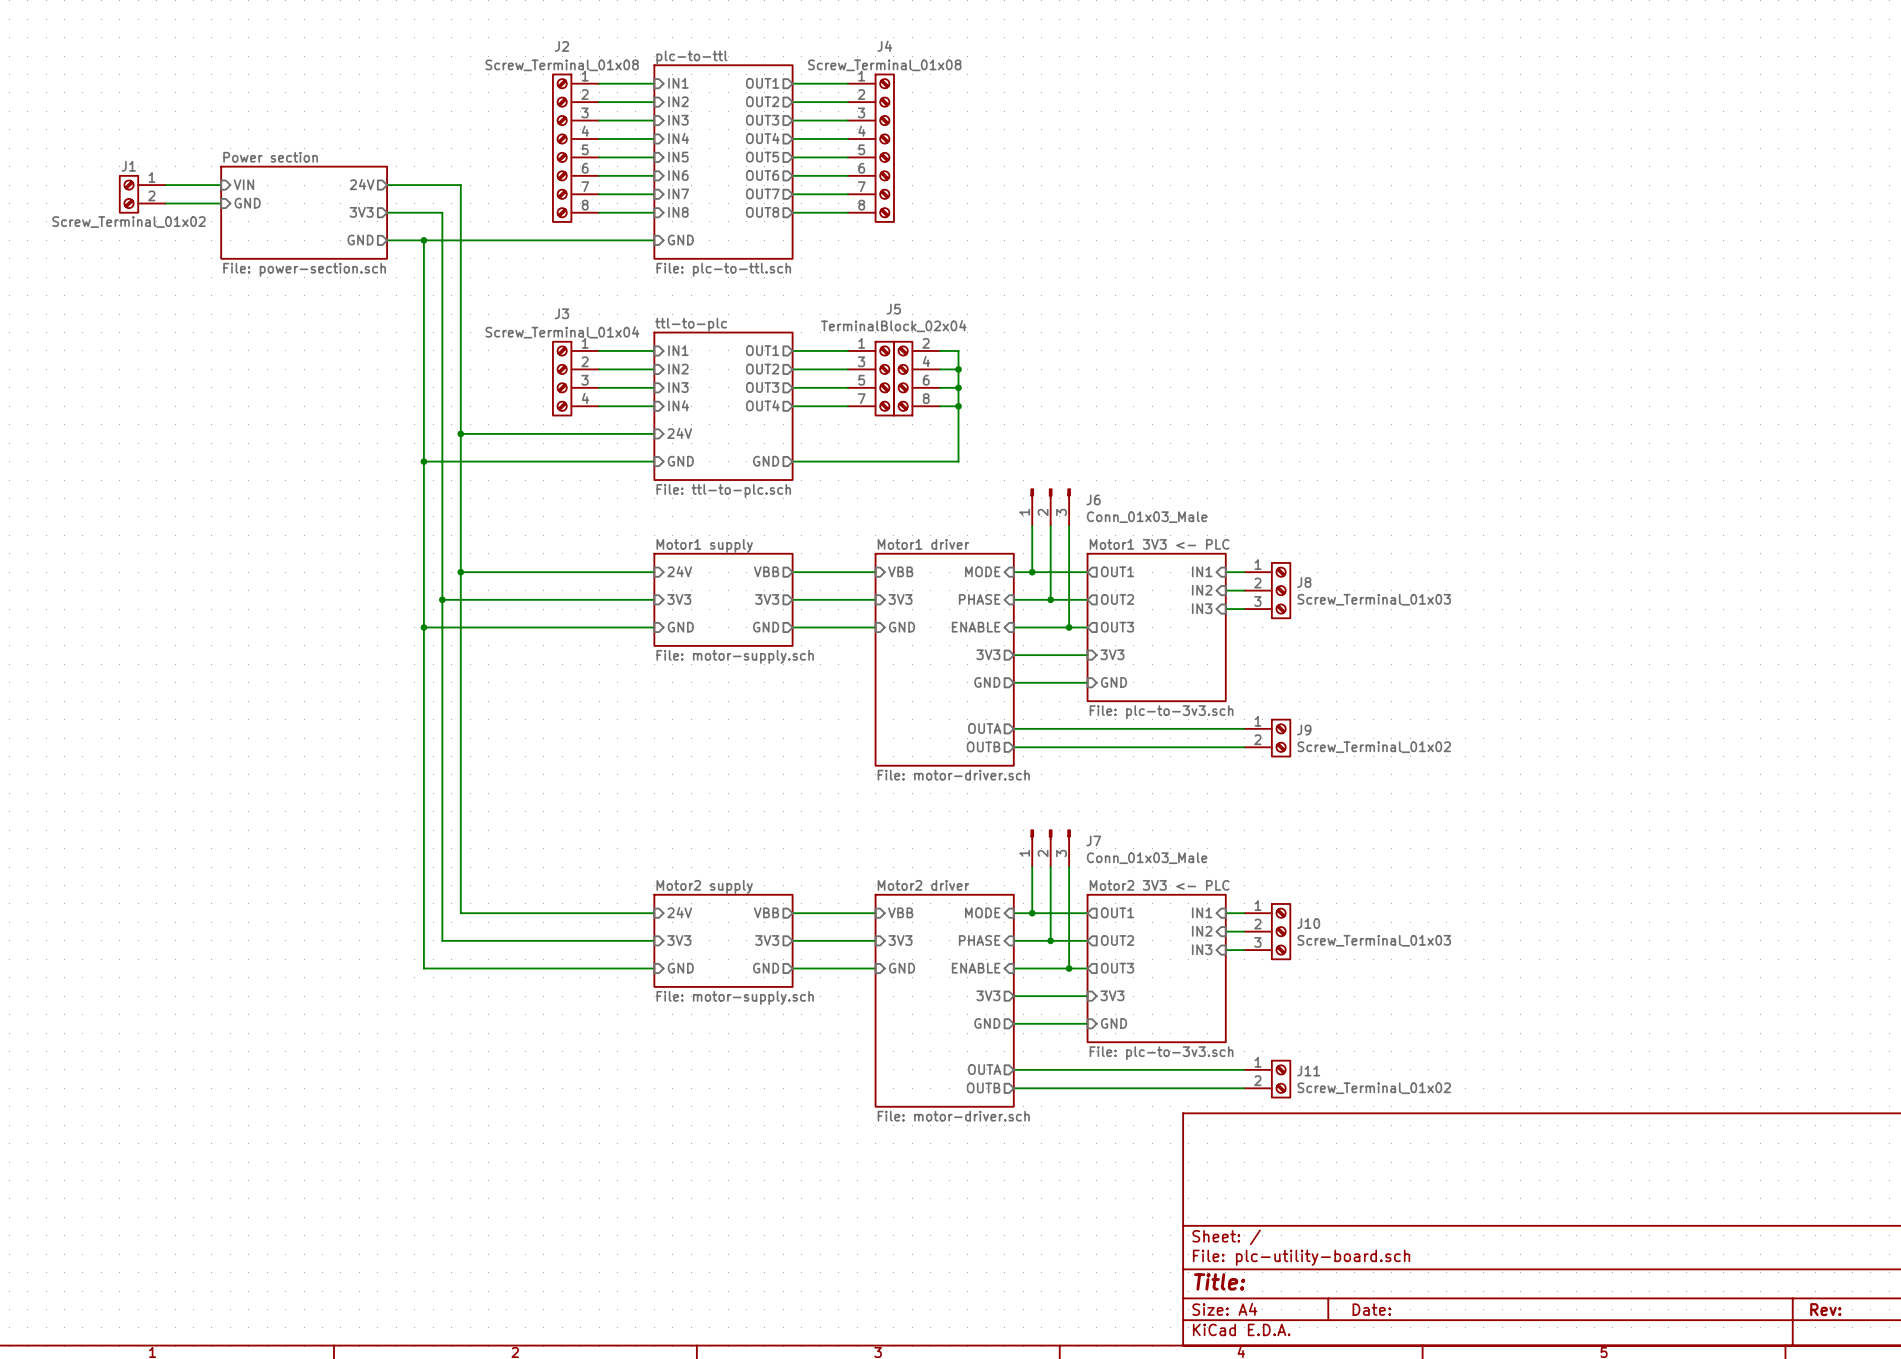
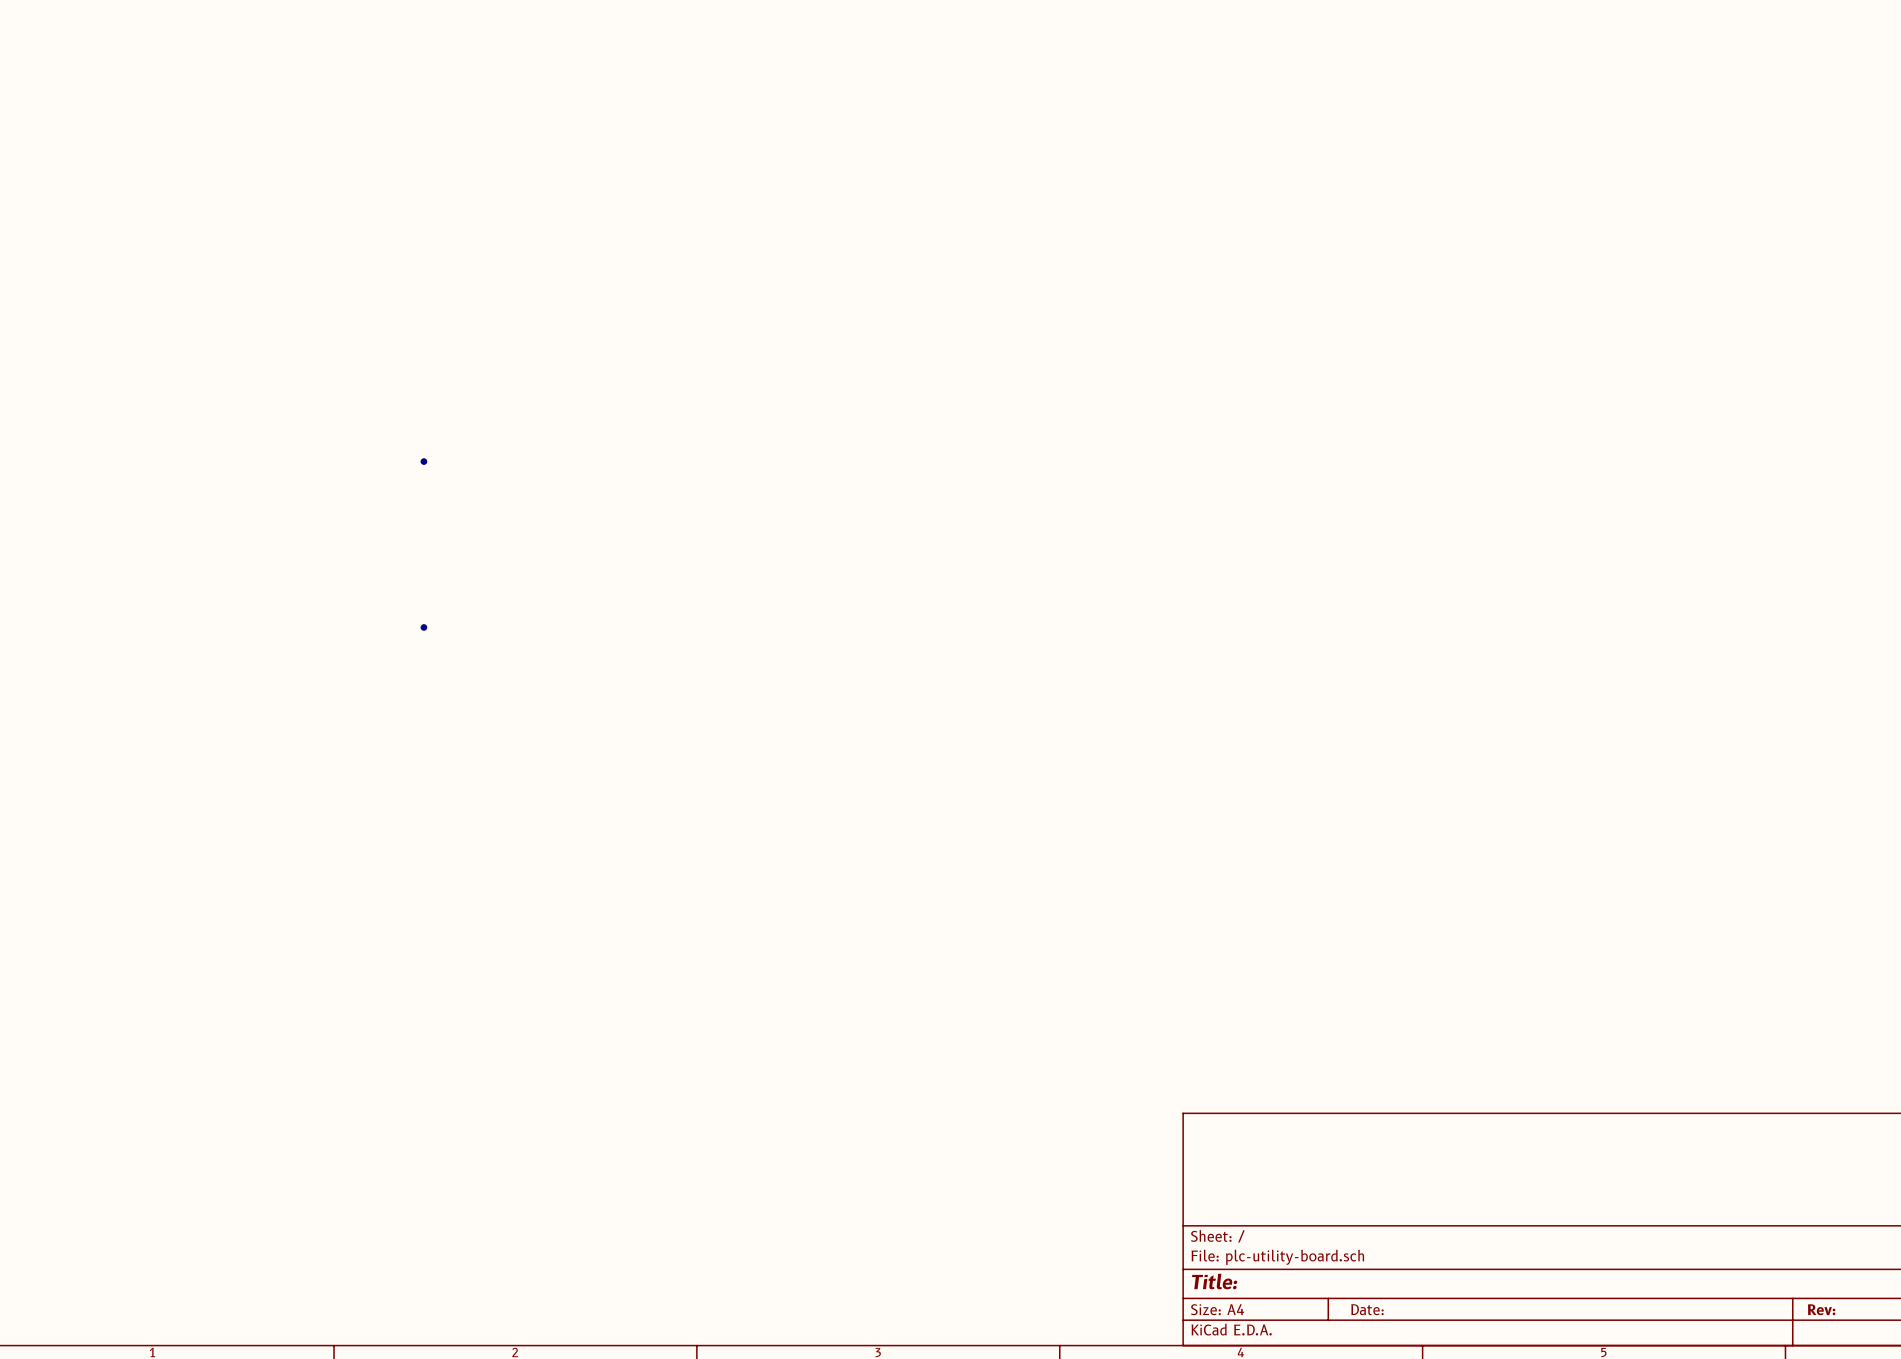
wire: (599, 83) (654, 83) -> none
sheet pin: IN1 (678, 83) -> none
sheet pin: OUT1 (762, 83) -> none
wire: (792, 83) (847, 83) -> none
sheet pin: IN2 (678, 101) -> none
sheet pin: OUT2 (762, 101) -> none
wire: (599, 102) (654, 102) -> none
wire: (792, 102) (847, 102) -> none
wire: (599, 120) (654, 120) -> none
sheet pin: IN3 (678, 120) -> none
sheet pin: OUT3 (762, 120) -> none
wire: (792, 120) (847, 120) -> none
wire: (599, 138) (654, 138) -> none
sheet pin: IN4 (678, 138) -> none
sheet pin: OUT4 (762, 138) -> none
wire: (792, 138) (847, 138) -> none
J2: Screw_Terminal_01x08 (575, 148) -> none
J4: Screw_Terminal_01x08 (871, 148) -> none
wire: (599, 157) (654, 157) -> none
sheet pin: IN5 (678, 157) -> none
sheet pin: OUT5 (762, 157) -> none
wire: (792, 157) (847, 157) -> none
sheet plc-to-ttl: File: plc-to-ttl.sch (723, 162) -> none
wire: (599, 175) (654, 175) -> none
sheet pin: IN6 (678, 175) -> none
sheet pin: OUT6 (762, 175) -> none
wire: (792, 175) (847, 175) -> none
sheet pin: VIN (243, 184) -> none
sheet pin: 24V (362, 184) -> none
wire: (165, 185) (221, 185) -> none
wire: (387, 185) (460, 185) (460, 913) (654, 913) -> none
sheet pin: IN7 (678, 193) -> none
sheet pin: OUT7 (762, 193) -> none
J1: Screw_Terminal_01x02 (142, 194) -> none
wire: (599, 194) (654, 194) -> none
wire: (792, 194) (847, 194) -> none
wire: (165, 203) (221, 203) -> none
sheet pin: GND (247, 203) -> none
sheet Power section: File: power-section.sch (304, 212) -> none
sheet pin: 3V3 (361, 212) -> none
wire: (387, 212) (442, 212) (442, 940) (654, 940) -> none
wire: (599, 212) (654, 212) -> none
sheet pin: IN8 (678, 212) -> none
sheet pin: OUT8 (762, 212) -> none
wire: (792, 212) (847, 212) -> none
sheet pin: GND (360, 240) -> none
wire: (387, 240) (654, 240) -> none
wire: (423, 240) (423, 968) (654, 968) -> none
junction: (423, 240) -> none
sheet pin: GND (680, 240) -> none
wire: (599, 350) (654, 350) -> none
sheet pin: IN1 (678, 350) -> none
sheet pin: OUT1 (762, 350) -> none
wire: (792, 350) (847, 350) -> none
wire: (940, 350) (958, 350) (958, 461) (792, 461) -> none
wire: (599, 369) (654, 369) -> none
sheet pin: IN2 (678, 369) -> none
sheet pin: OUT2 (762, 369) -> none
wire: (792, 369) (847, 369) -> none
wire: (940, 369) (958, 369) -> none
junction: (958, 369) -> none
J3: Screw_Terminal_01x04 (575, 378) -> none
J5: TerminalBlock_02x04 (893, 378) -> none
wire: (599, 387) (654, 387) -> none
sheet pin: IN3 (678, 387) -> none
sheet pin: OUT3 (762, 387) -> none
wire: (792, 387) (847, 387) -> none
wire: (940, 387) (958, 387) -> none
junction: (958, 387) -> none
sheet pin: IN4 (678, 405) -> none
sheet pin: OUT4 (762, 405) -> none
wire: (599, 406) (654, 406) -> none
sheet ttl-to-plc: File: ttl-to-plc.sch (723, 406) -> none
wire: (792, 406) (847, 406) -> none
wire: (940, 406) (958, 406) -> none
junction: (958, 406) -> none
wire: (460, 433) (654, 433) -> none
junction: (460, 433) -> none
sheet pin: 24V (679, 433) -> none
wire: (423, 461) (654, 461) -> none
sheet pin: GND (680, 461) -> none
sheet pin: GND (766, 461) -> none
J6: Conn_01x03_Male (1050, 507) -> none
wire: (1032, 526) (1032, 572) -> none
wire: (1050, 526) (1050, 599) -> none
wire: (1069, 526) (1069, 627) -> none
sheet pin: 24V (679, 571) -> none
sheet pin: VBB (766, 571) -> none
sheet pin: VBB (900, 571) -> none
sheet pin: MODE (982, 571) -> none
sheet pin: OUT1 (1117, 571) -> none
sheet pin: IN1 (1202, 571) -> none
wire: (460, 572) (654, 572) -> none
junction: (460, 572) -> none
wire: (792, 572) (875, 572) -> none
wire: (1013, 572) (1087, 572) -> none
junction: (1032, 572) -> none
wire: (1225, 572) (1244, 572) -> none
sheet pin: IN2 (1202, 590) -> none
wire: (1225, 590) (1244, 590) -> none
J8: Screw_Terminal_01x03 (1267, 590) -> none
wire: (442, 599) (654, 599) -> none
junction: (442, 599) -> none
sheet pin: 3V3 (679, 599) -> none
sheet Motor1 supply: File: motor-supply.sch (723, 599) -> none
sheet pin: 3V3 (767, 599) -> none
wire: (792, 599) (875, 599) -> none
sheet pin: 3V3 (900, 599) -> none
sheet pin: PHASE (979, 599) -> none
wire: (1013, 599) (1087, 599) -> none
junction: (1050, 599) -> none
sheet pin: OUT2 (1117, 599) -> none
sheet pin: IN3 (1202, 608) -> none
wire: (1225, 609) (1244, 609) -> none
wire: (423, 627) (654, 627) -> none
sheet pin: GND (680, 627) -> none
sheet pin: GND (766, 627) -> none
wire: (792, 627) (875, 627) -> none
sheet pin: GND (902, 627) -> none
sheet pin: ENABLE (976, 627) -> none
wire: (1013, 627) (1087, 627) -> none
junction: (1069, 627) -> none
sheet pin: OUT3 (1117, 627) -> none
sheet Motor1 3V3 <- PLC: File: plc-to-3v3.sch (1156, 627) -> none
sheet pin: 3V3 (988, 654) -> none
sheet pin: 3V3 (1112, 654) -> none
wire: (1013, 655) (1087, 655) -> none
sheet Motor1 driver: File: motor-driver.sch (944, 659) -> none
sheet pin: GND (987, 682) -> none
wire: (1013, 682) (1087, 682) -> none
sheet pin: GND (1114, 682) -> none
sheet pin: OUTA (984, 728) -> none
wire: (1013, 728) (1244, 728) -> none
J9: Screw_Terminal_01x02 (1267, 738) -> none
sheet pin: OUTB (983, 746) -> none
wire: (1013, 747) (1244, 747) -> none
J7: Conn_01x03_Male (1050, 848) -> none
wire: (1032, 867) (1032, 913) -> none
wire: (1050, 867) (1050, 940) -> none
wire: (1069, 867) (1069, 968) -> none
sheet pin: 24V (679, 912) -> none
sheet pin: VBB (766, 912) -> none
sheet pin: VBB (900, 912) -> none
sheet pin: MODE (982, 912) -> none
sheet pin: OUT1 (1117, 912) -> none
sheet pin: IN1 (1202, 912) -> none
wire: (792, 913) (875, 913) -> none
wire: (1013, 913) (1087, 913) -> none
junction: (1032, 913) -> none
wire: (1225, 913) (1244, 913) -> none
sheet pin: IN2 (1202, 931) -> none
wire: (1225, 931) (1244, 931) -> none
J10: Screw_Terminal_01x03 (1267, 931) -> none
sheet pin: 3V3 (679, 940) -> none
sheet Motor2 supply: File: motor-supply.sch (723, 940) -> none
sheet pin: 3V3 (767, 940) -> none
wire: (792, 940) (875, 940) -> none
sheet pin: 3V3 (900, 940) -> none
sheet pin: PHASE (979, 940) -> none
wire: (1013, 940) (1087, 940) -> none
junction: (1050, 940) -> none
sheet pin: OUT2 (1117, 940) -> none
sheet pin: IN3 (1202, 949) -> none
wire: (1225, 950) (1244, 950) -> none
sheet pin: GND (680, 968) -> none
sheet pin: GND (766, 968) -> none
wire: (792, 968) (875, 968) -> none
sheet pin: GND (902, 968) -> none
sheet pin: ENABLE (976, 968) -> none
wire: (1013, 968) (1087, 968) -> none
junction: (1069, 968) -> none
sheet pin: OUT3 (1117, 968) -> none
sheet Motor2 3V3 <- PLC: File: plc-to-3v3.sch (1156, 968) -> none
sheet pin: 3V3 (988, 995) -> none
sheet pin: 3V3 (1112, 995) -> none
wire: (1013, 996) (1087, 996) -> none
sheet Motor2 driver: File: motor-driver.sch (944, 1000) -> none
sheet pin: GND (987, 1023) -> none
wire: (1013, 1023) (1087, 1023) -> none
sheet pin: GND (1114, 1023) -> none
sheet pin: OUTA (984, 1069) -> none
wire: (1013, 1069) (1244, 1069) -> none
J11: Screw_Terminal_01x02 (1267, 1079) -> none
sheet pin: OUTB (983, 1087) -> none
wire: (1013, 1088) (1244, 1088) -> none

